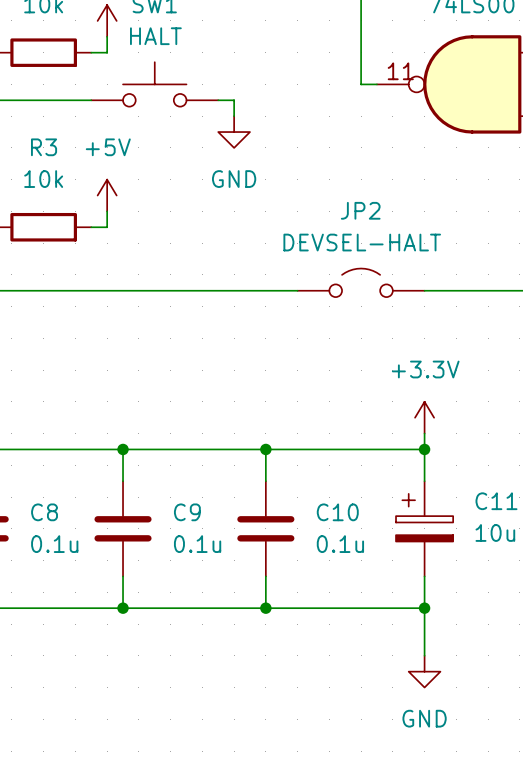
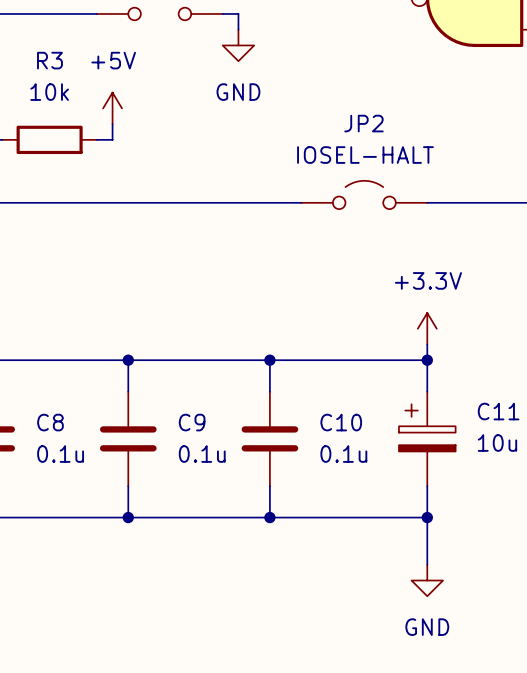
JP2 value: DEVSEL-HALT (362, 242) -> IOSEL-HALT (365, 155)

